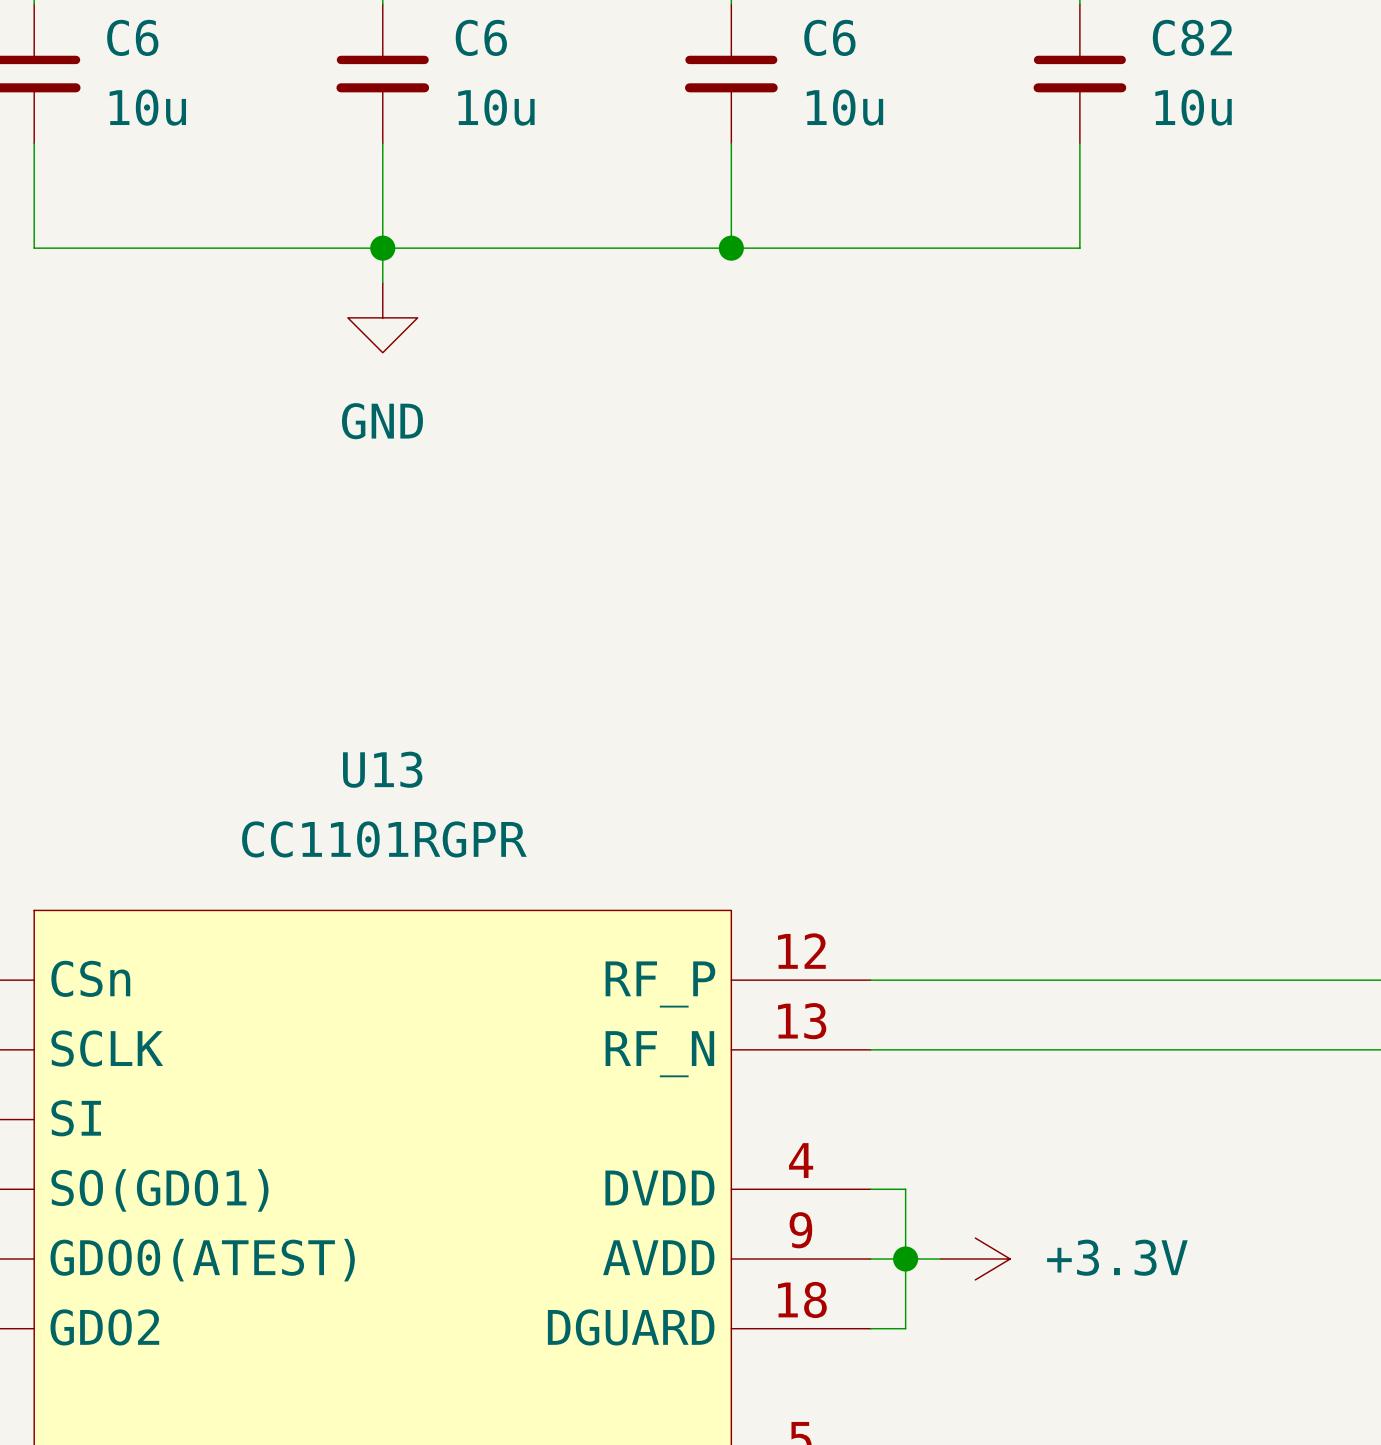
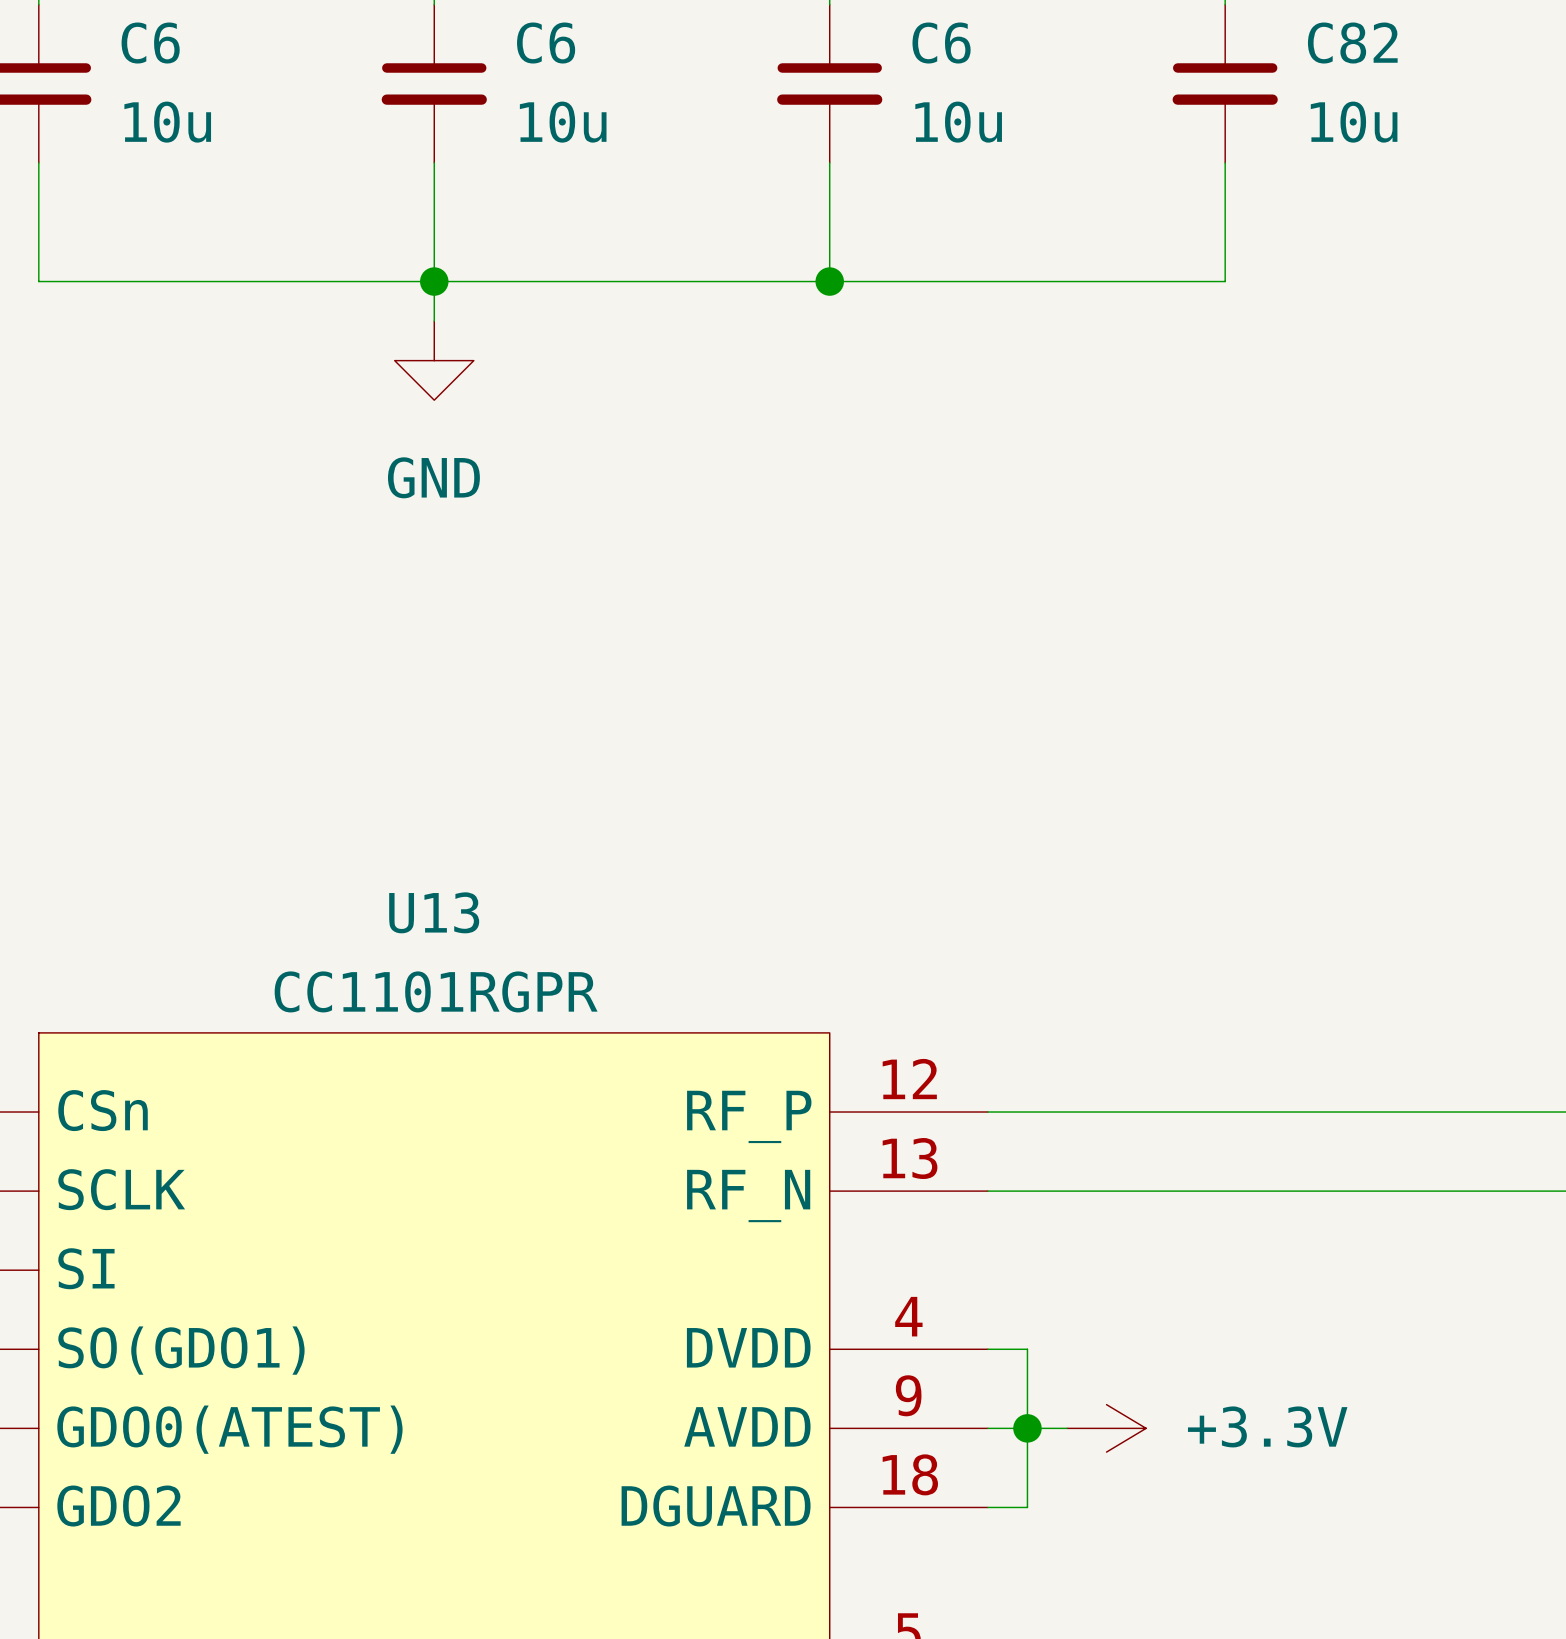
U13 name position: U13 (382, 769) -> U13 (434, 912)
U13 value position: CC1101RGPR (384, 839) -> CC1101RGPR (436, 991)

